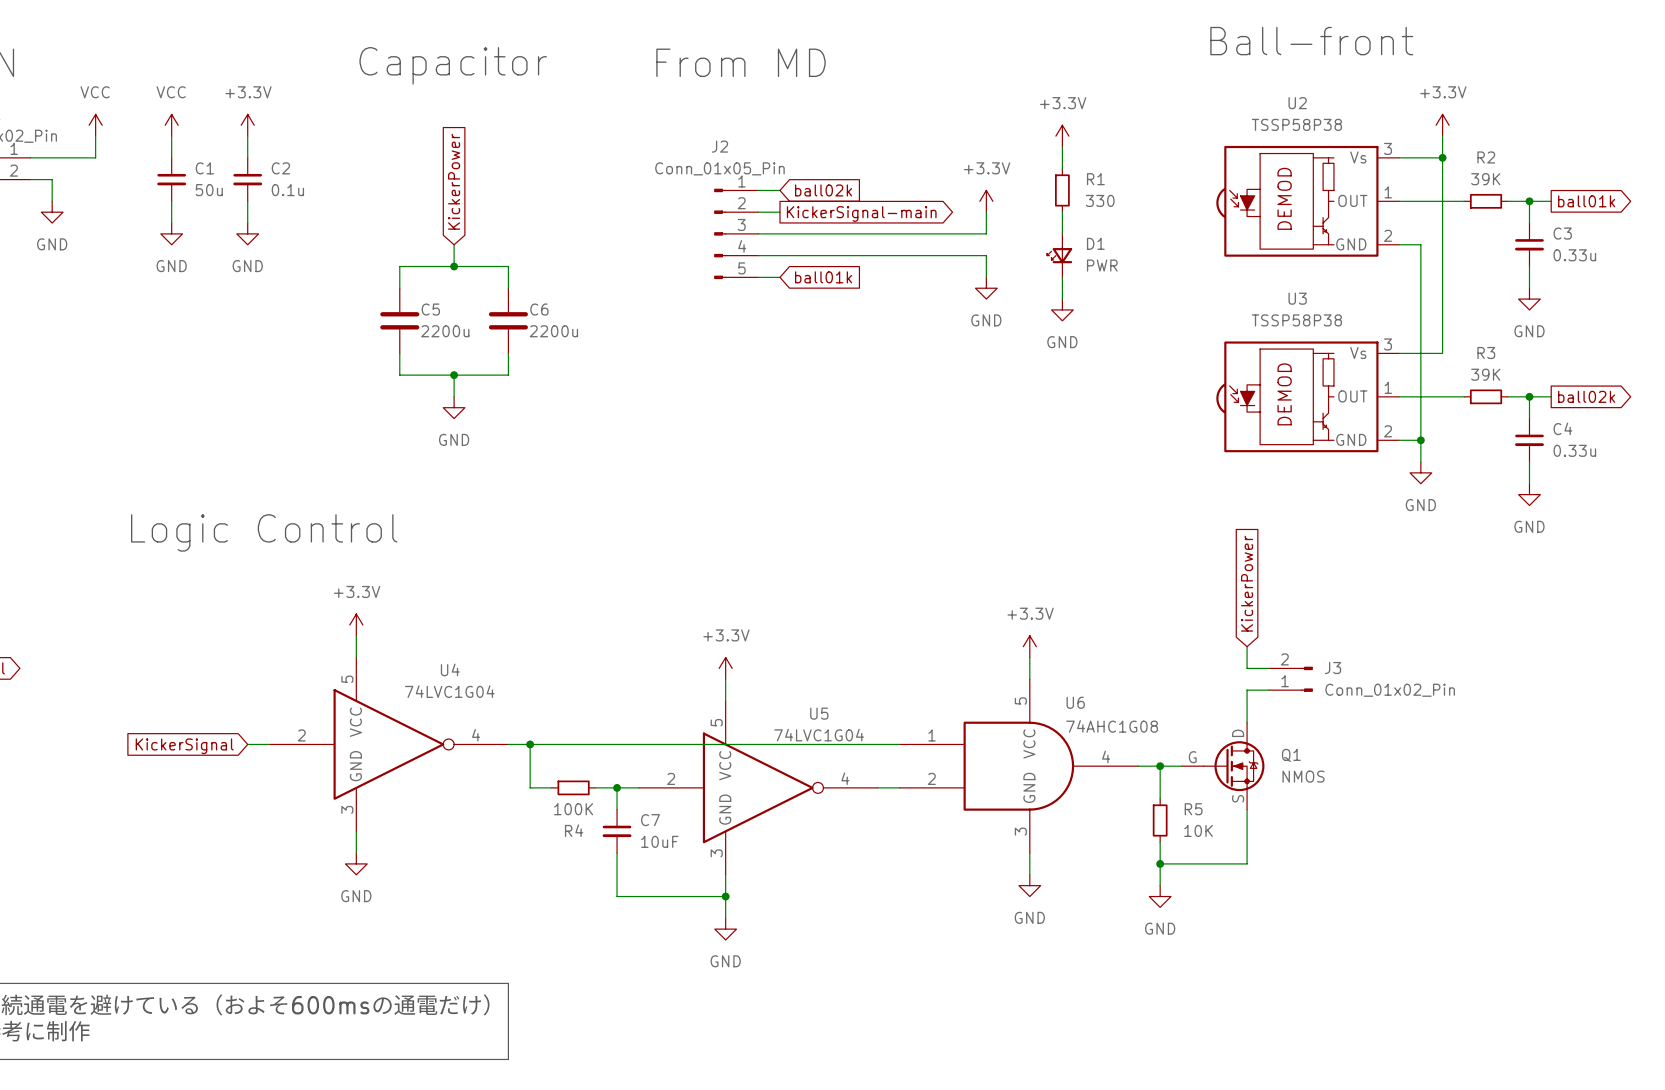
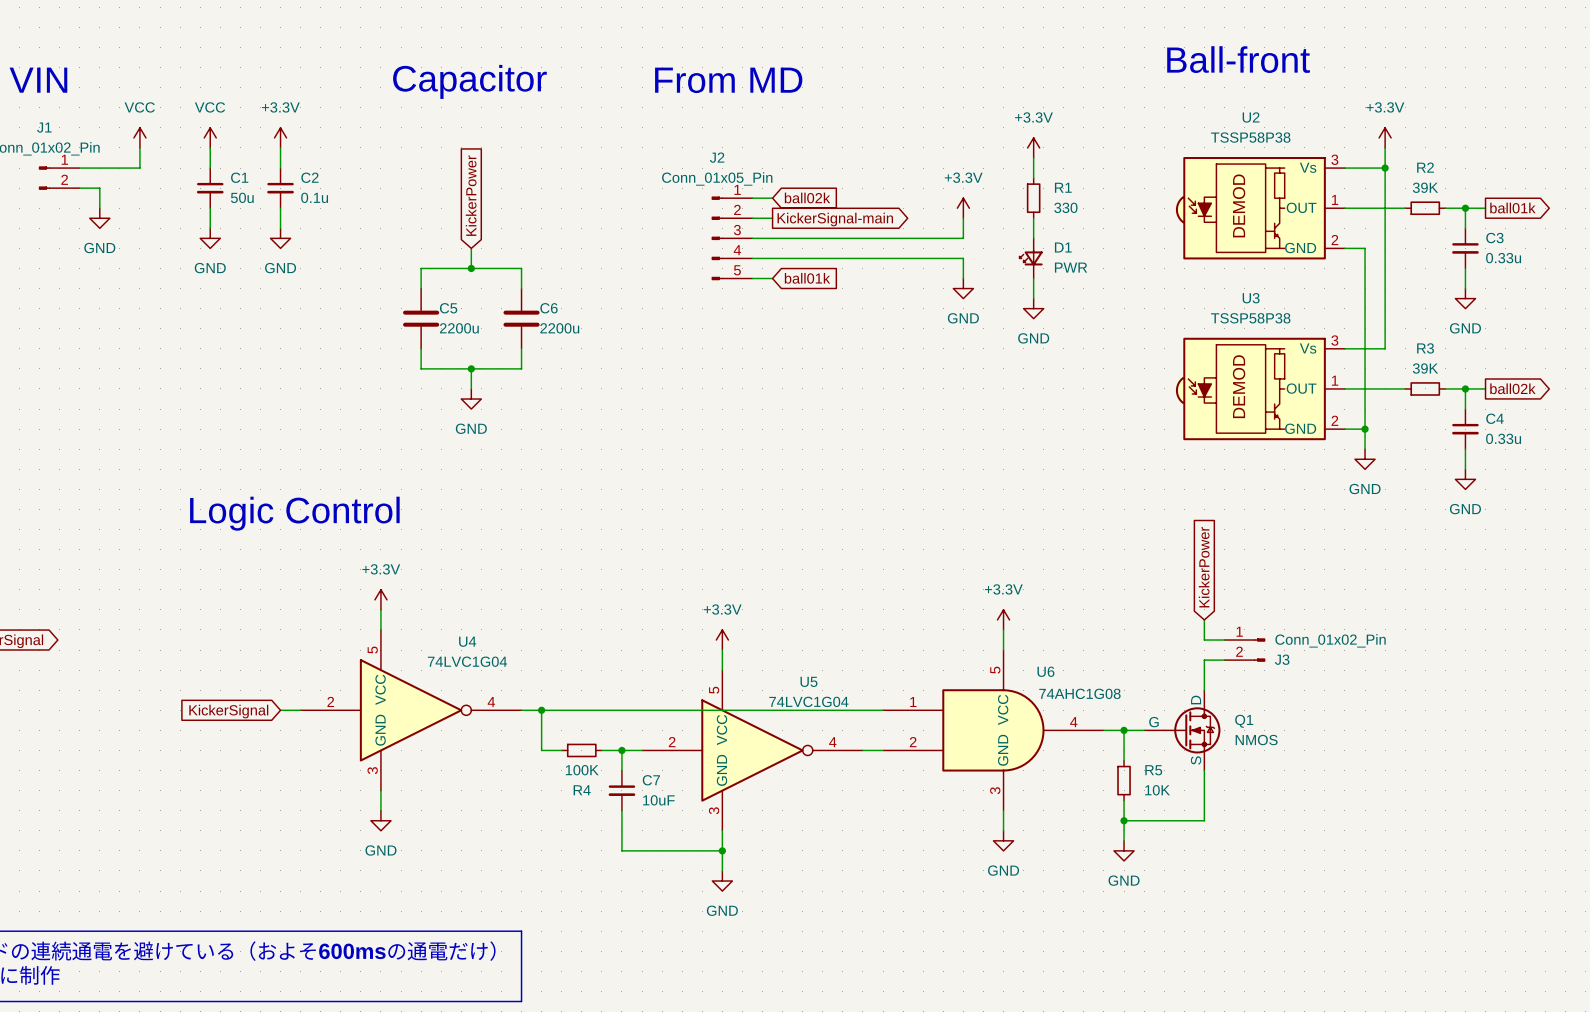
J3 flip: as is (1306, 679) -> up-down (1259, 650)

